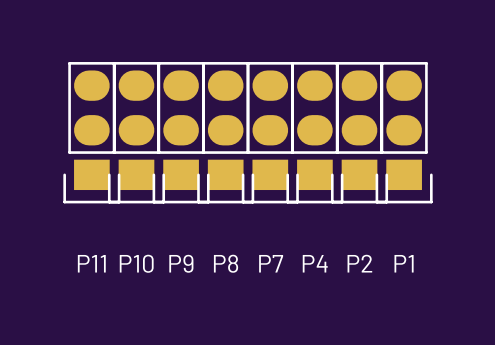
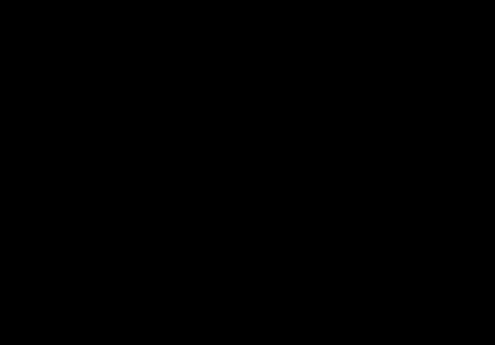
P11: (91, 132) -> none
P10: (136, 132) -> none
P9: (181, 132) -> none
P8: (225, 132) -> none
P7: (270, 132) -> none
P4: (314, 132) -> none
P2: (359, 132) -> none
P1: (404, 132) -> none

